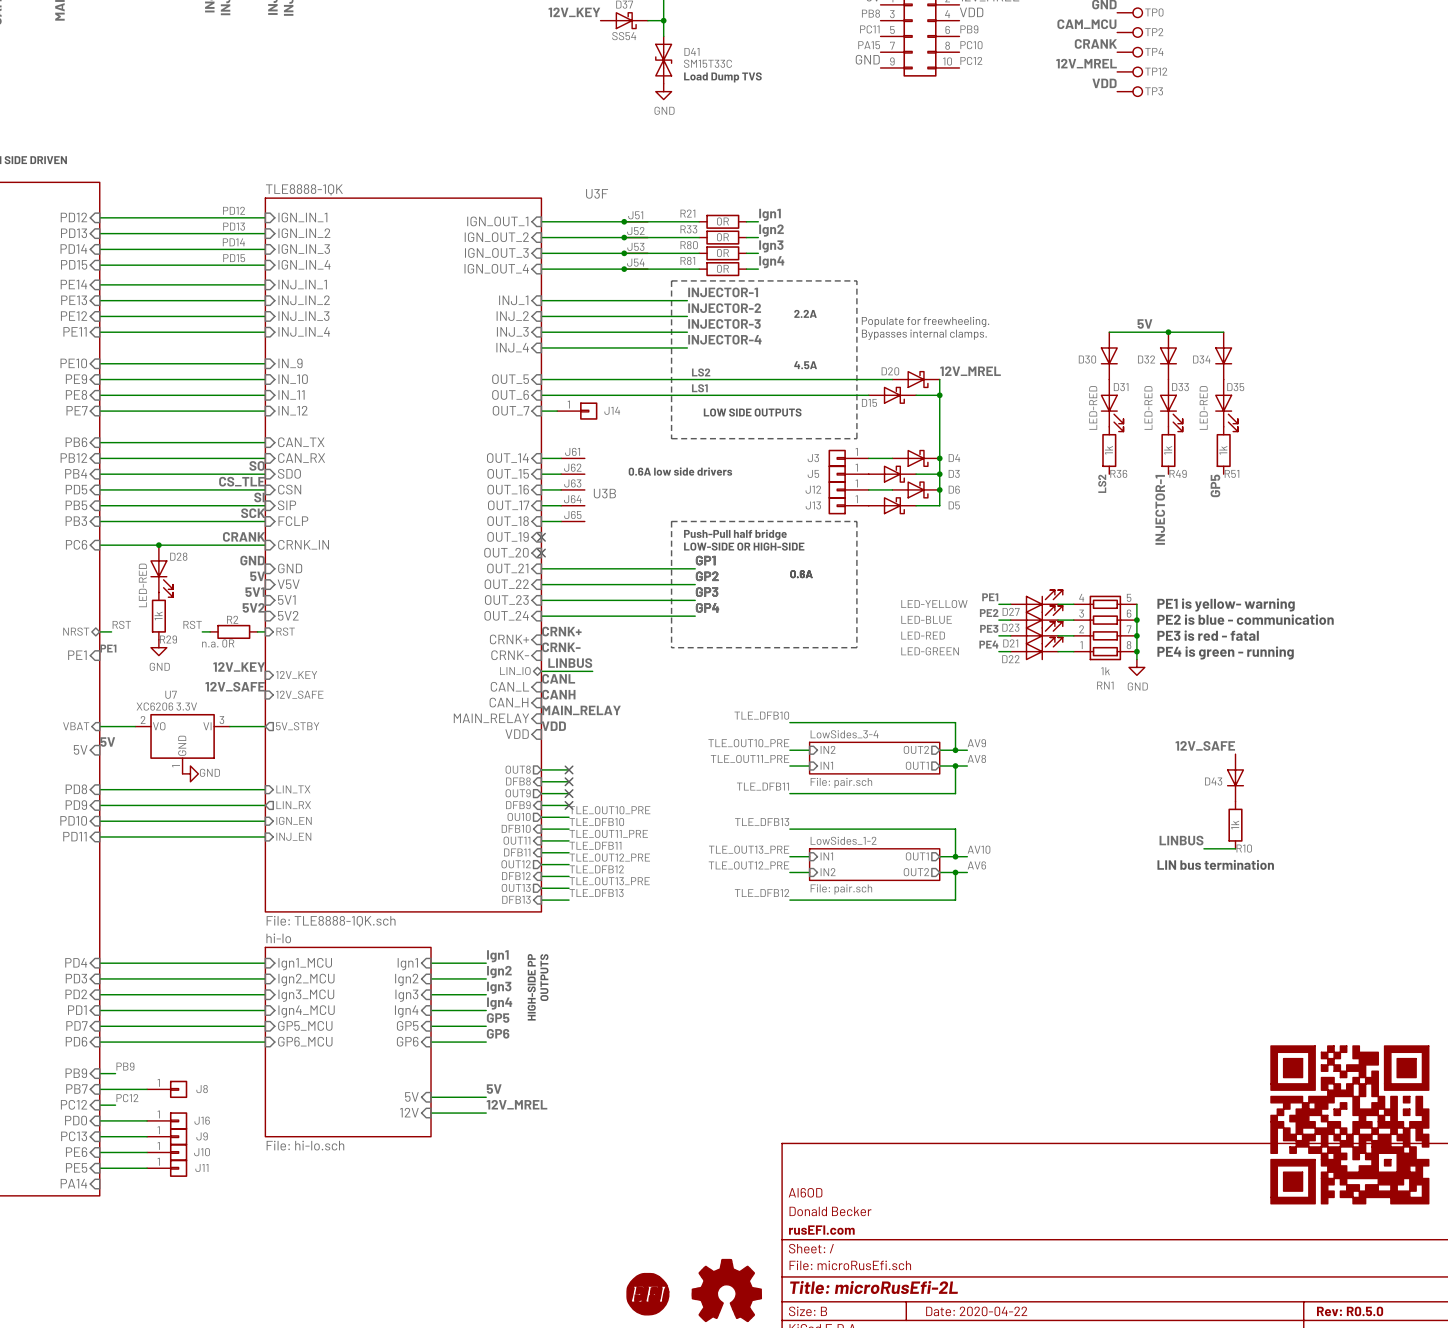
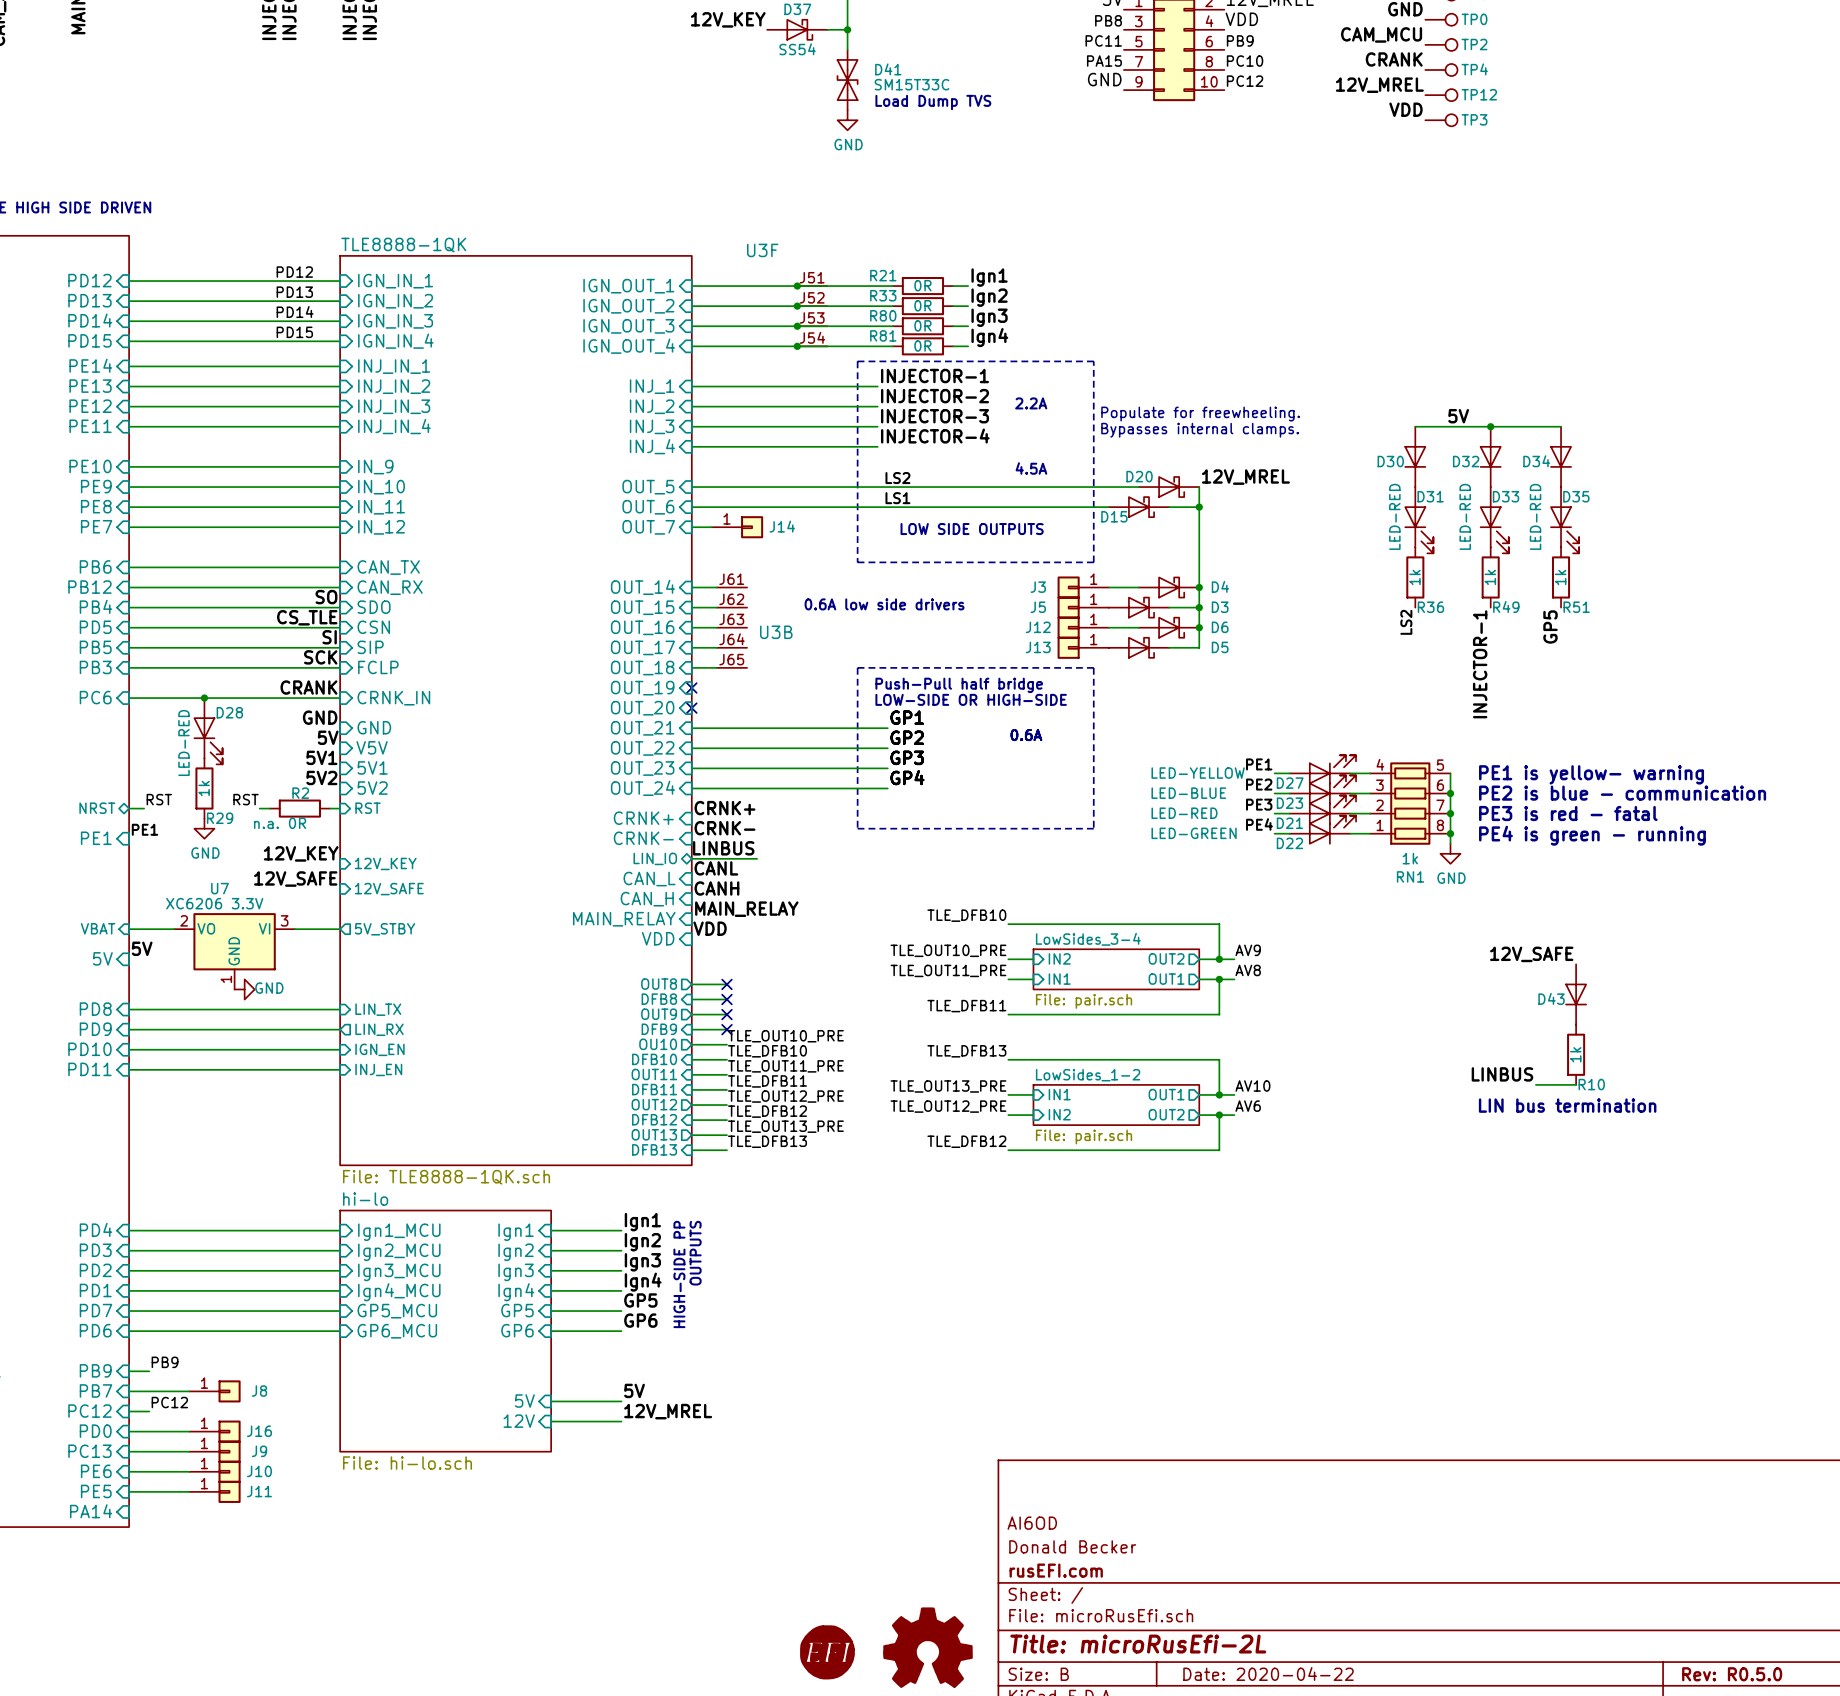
part: (1349, 1124) -> none

